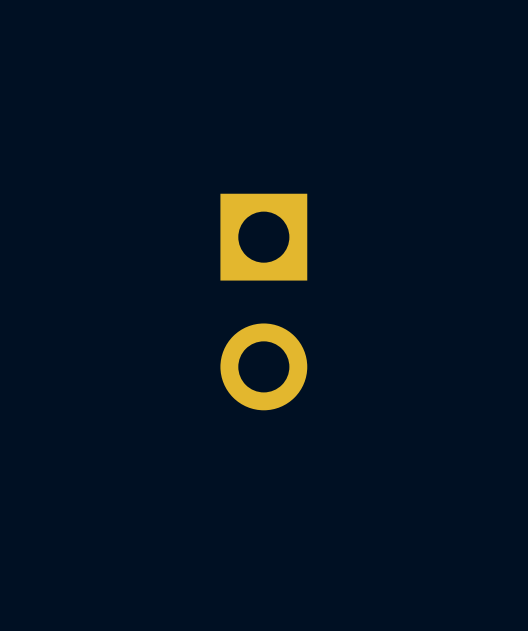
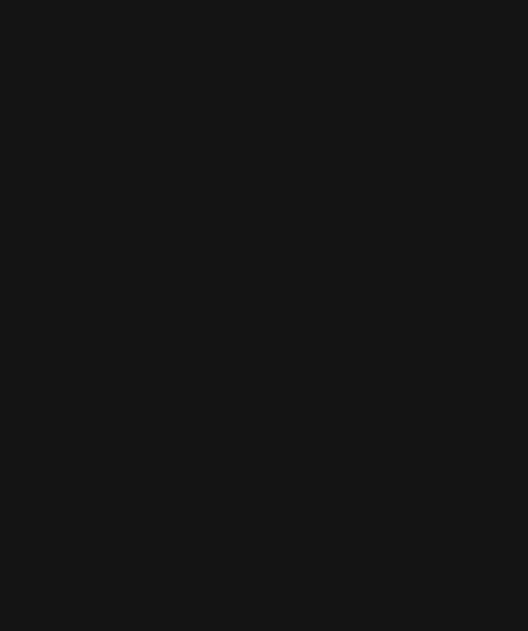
part: (263, 302) -> none

